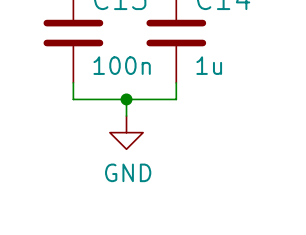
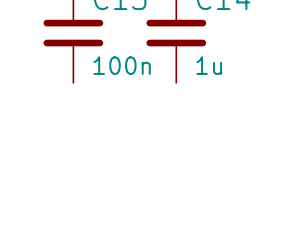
wire: (73, 82) (73, 99) (176, 99) (176, 82) -> none
wire: (126, 99) (126, 116) -> none
junction: (126, 99) -> none
power symbol: GND (126, 132) -> none

